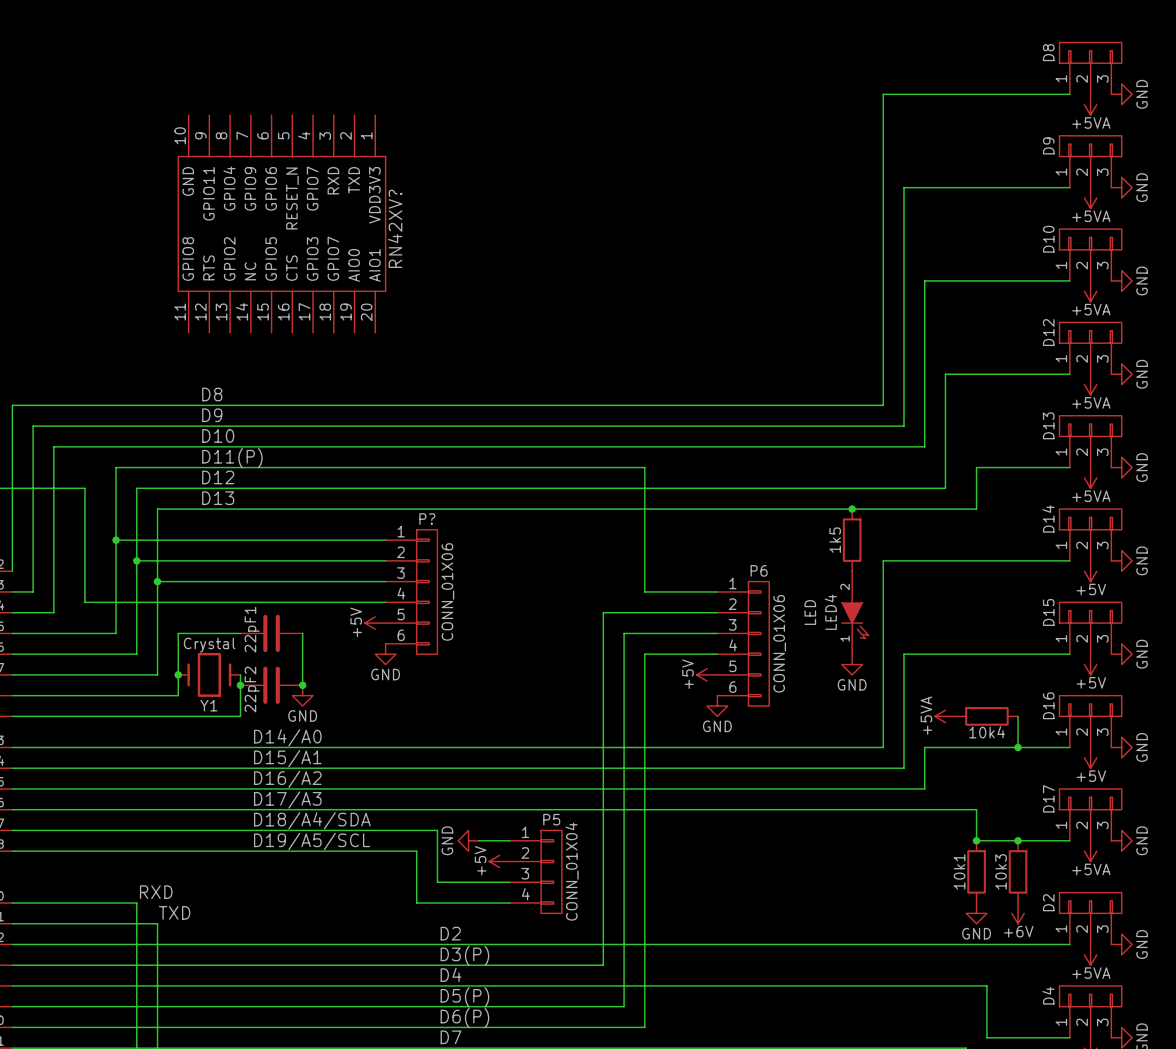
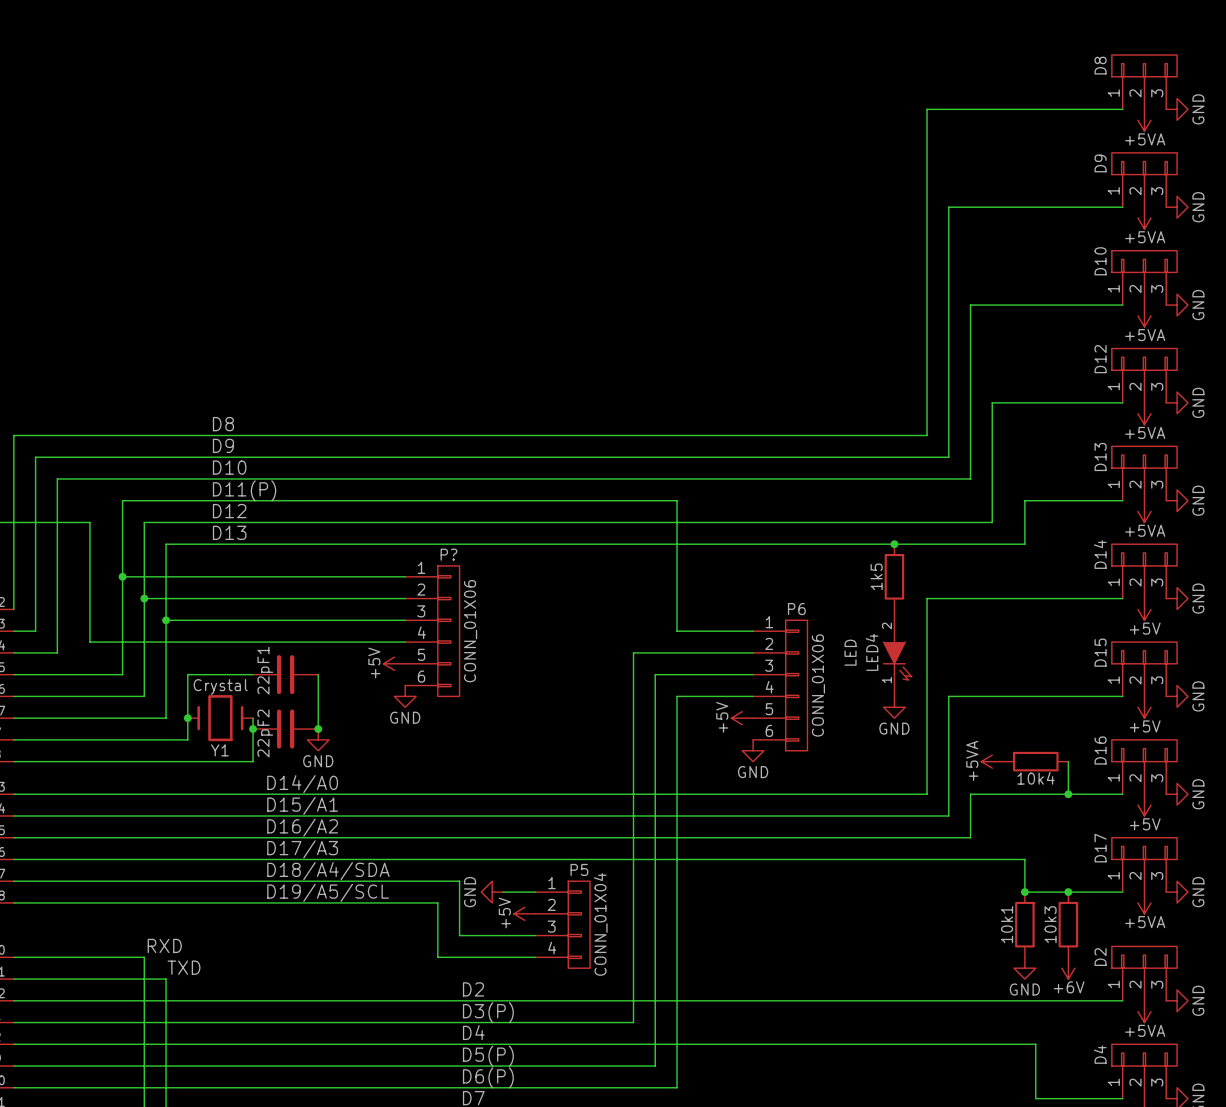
RN42XV?: (281, 223) -> none

